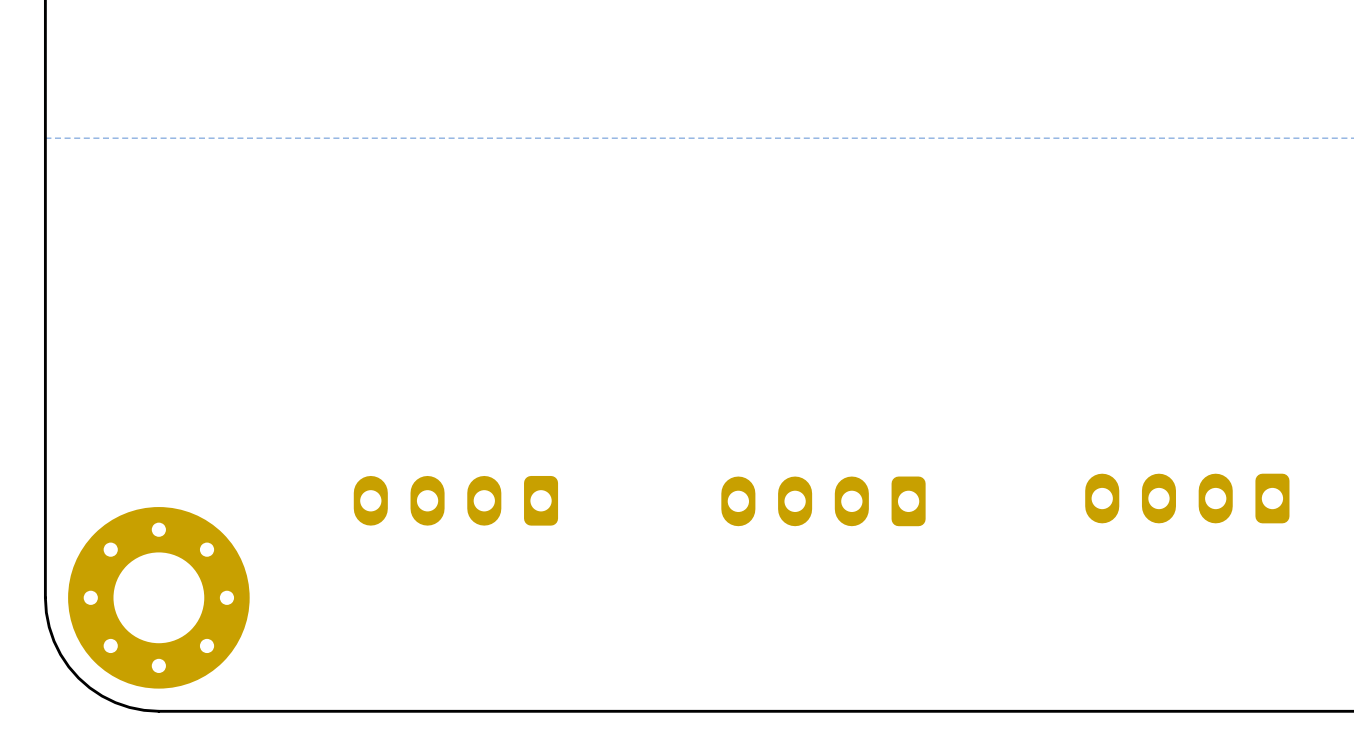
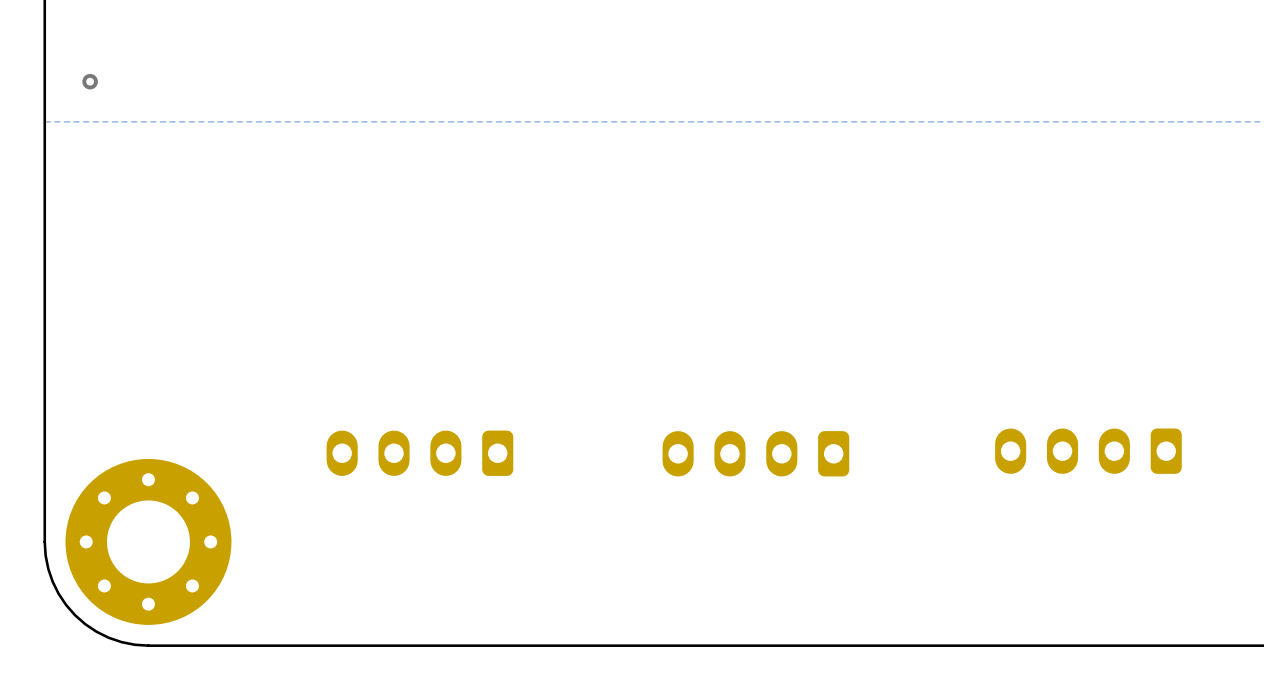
via: none -> (90, 81)

